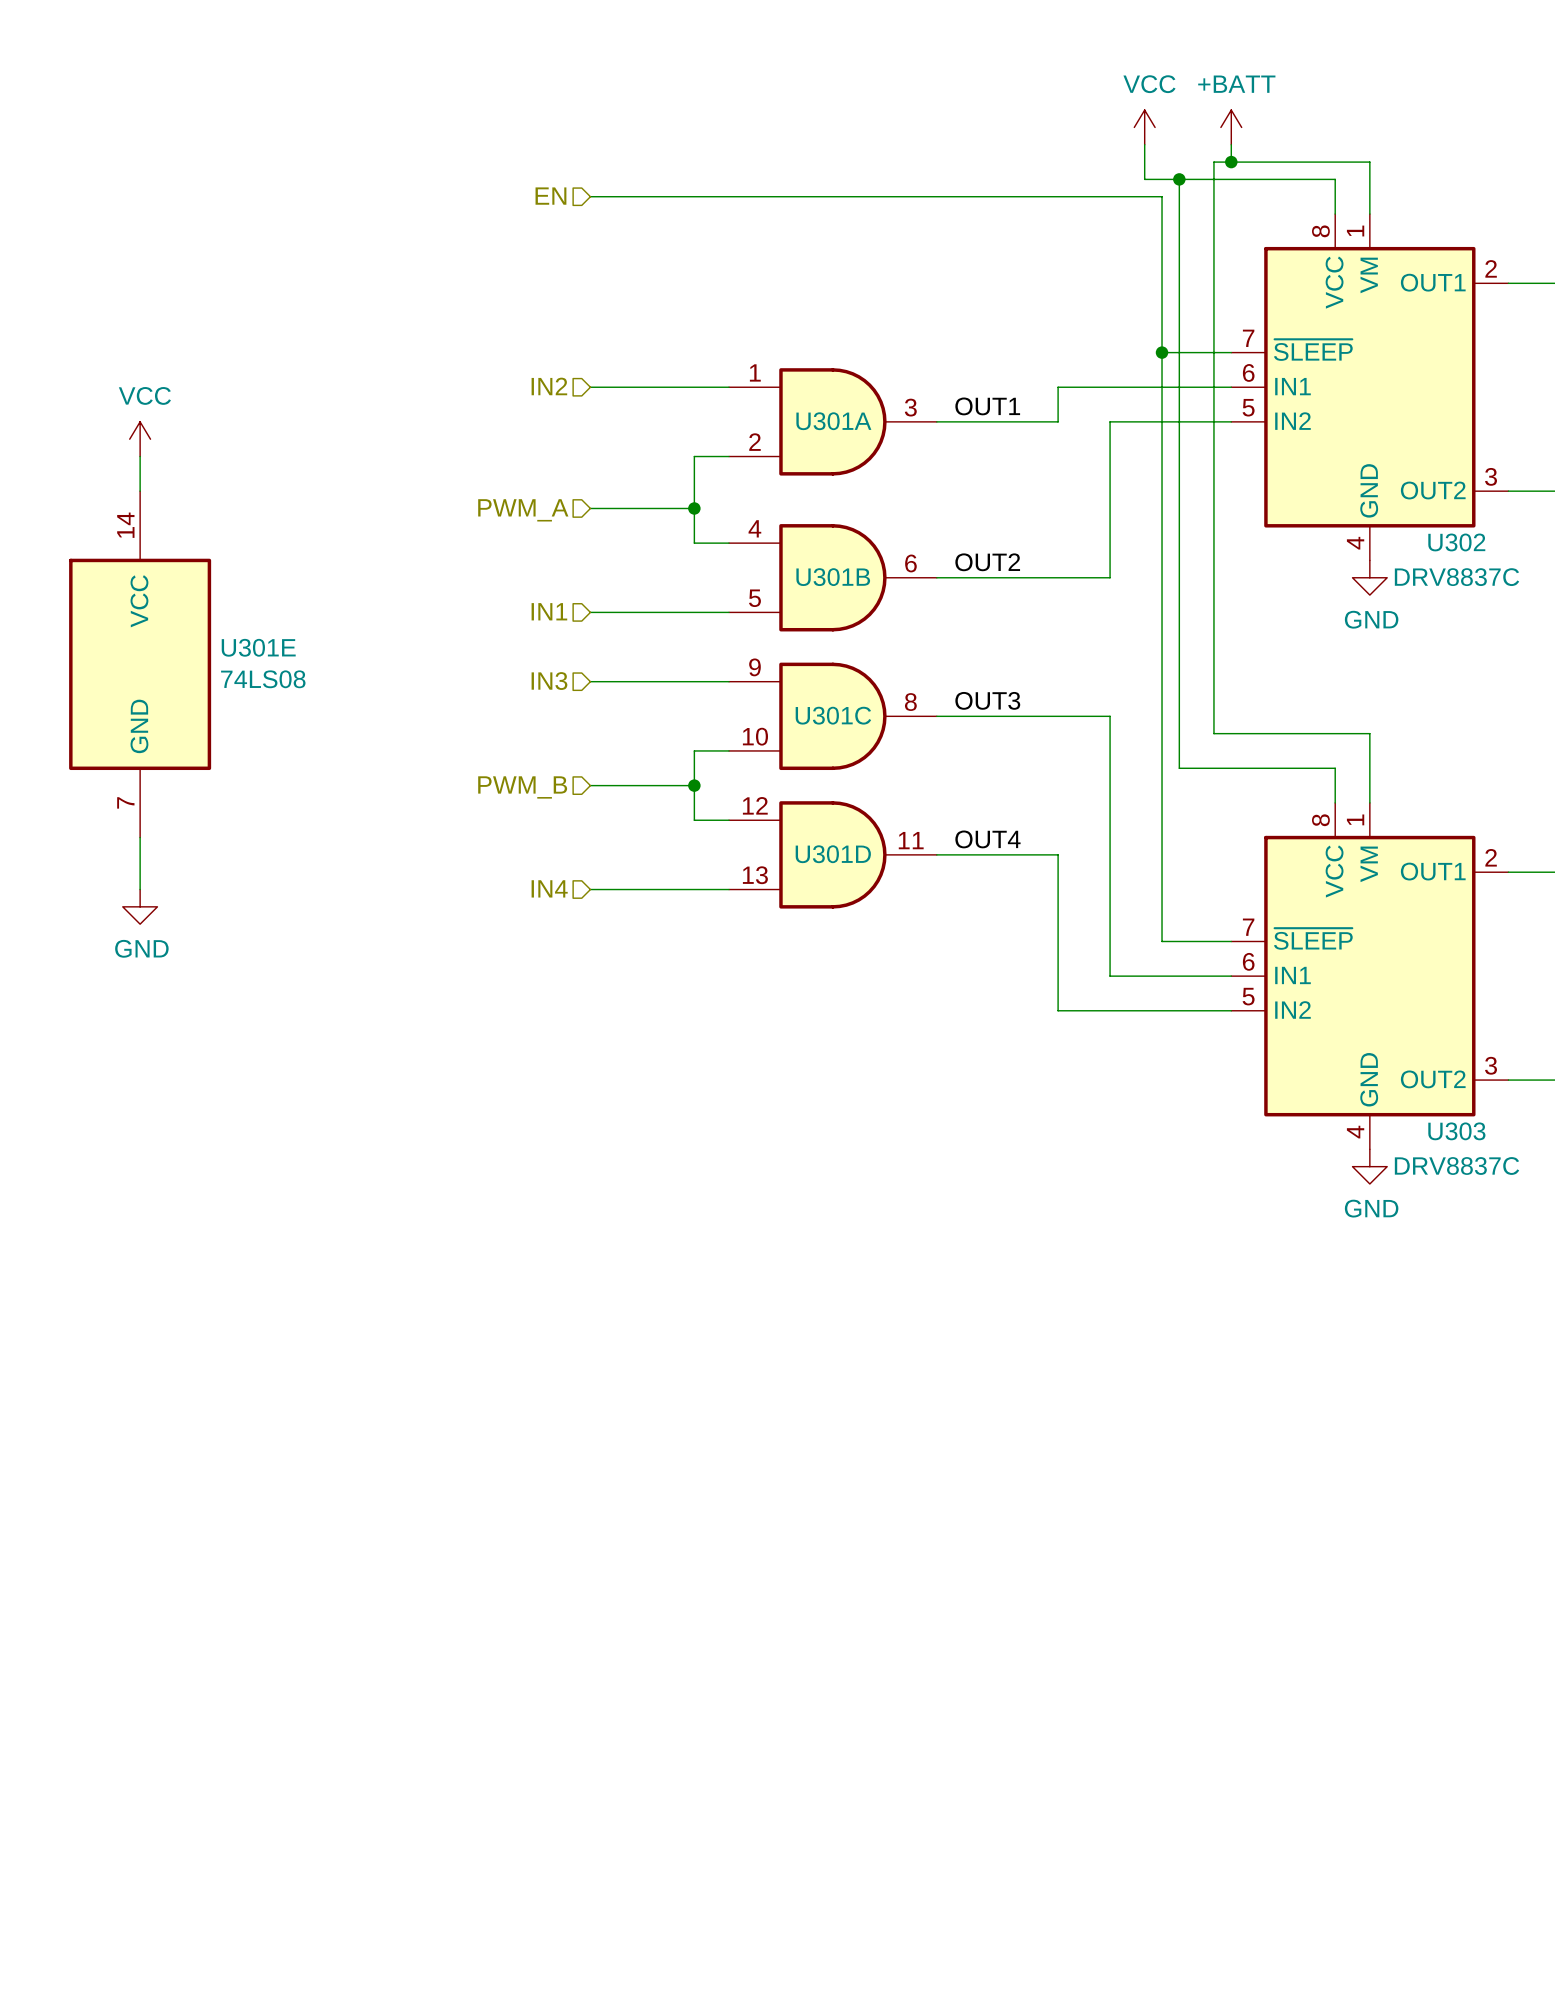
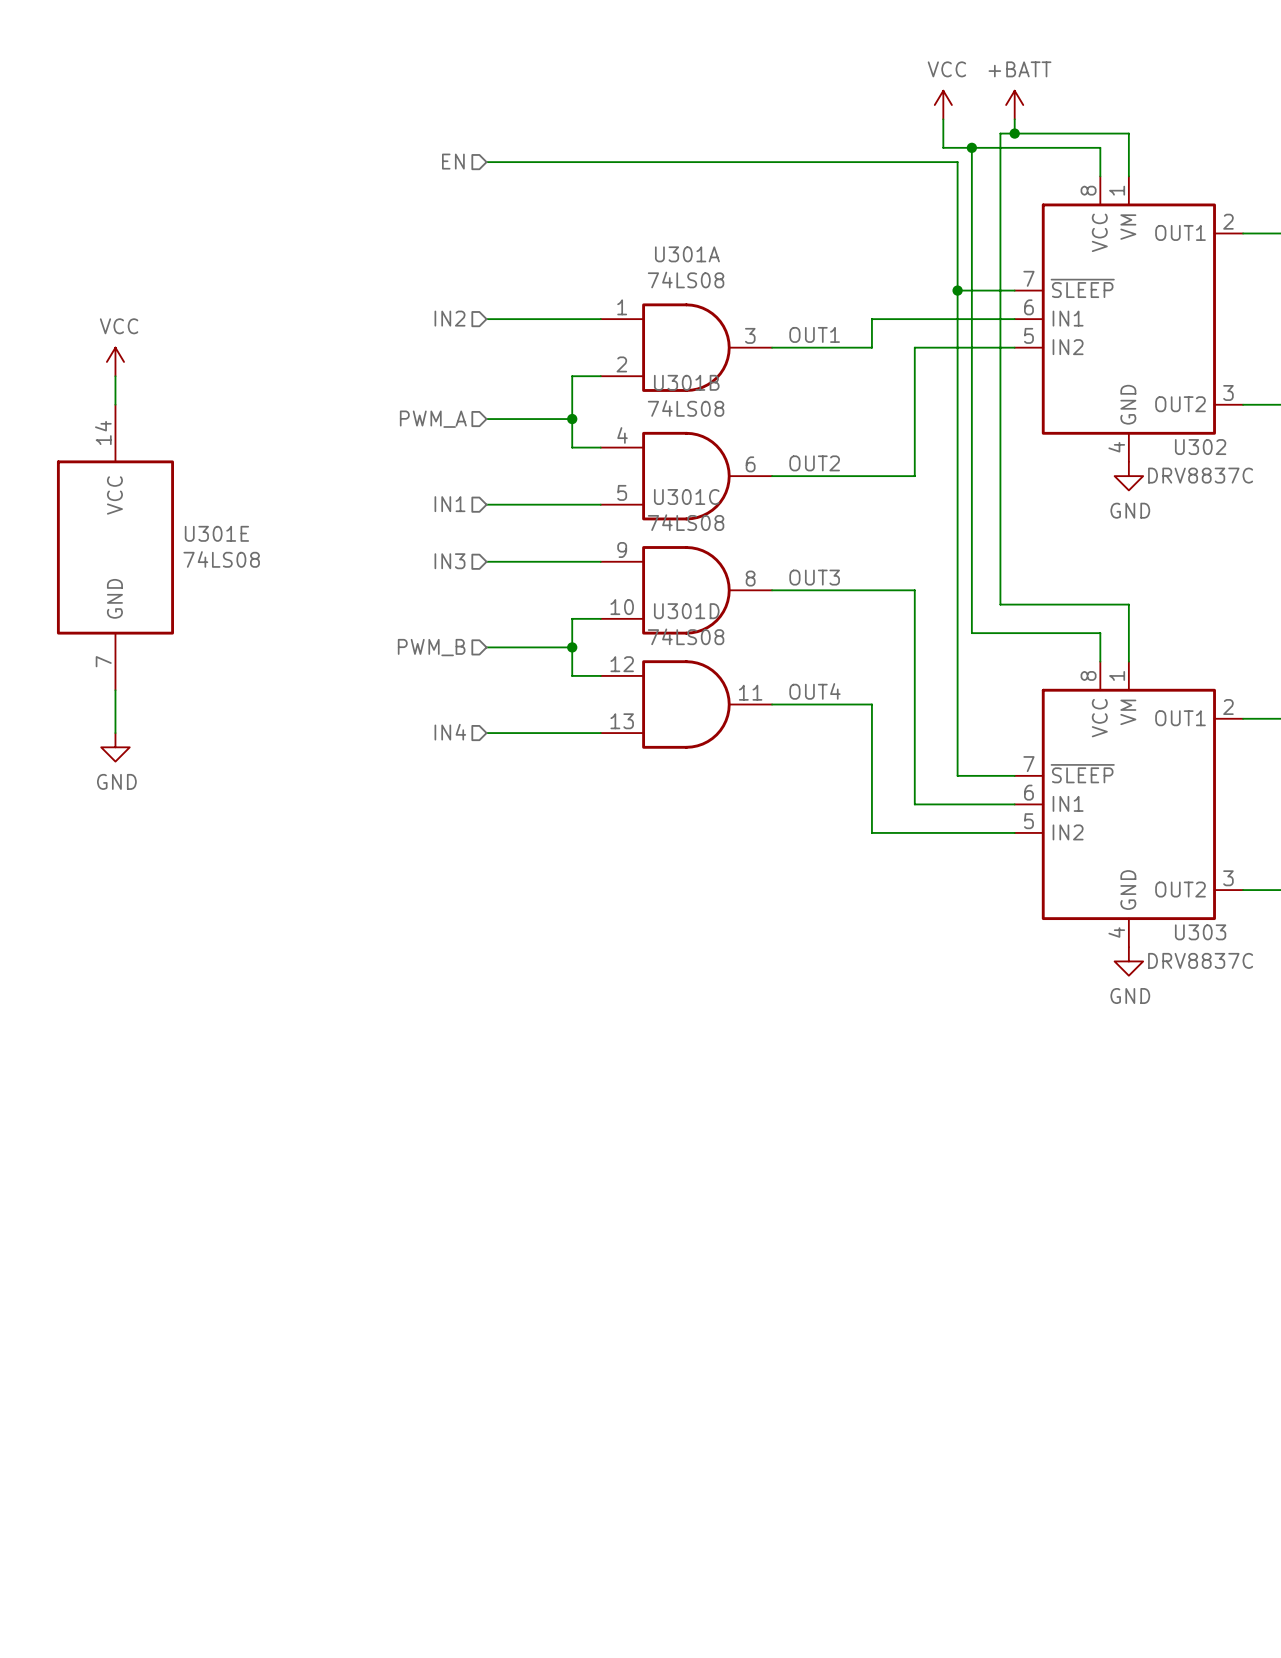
U301A value: none -> 74LS08 (686, 279)
U301A name position: U301A (833, 421) -> U301A (687, 254)
U301B value: none -> 74LS08 (686, 408)
U301B name position: U301B (833, 577) -> U301B (686, 382)
U301C value: none -> 74LS08 (686, 522)
U301C name position: U301C (833, 715) -> U301C (686, 497)
U301D value: none -> 74LS08 (686, 636)
U301D name position: U301D (833, 854) -> U301D (686, 611)

